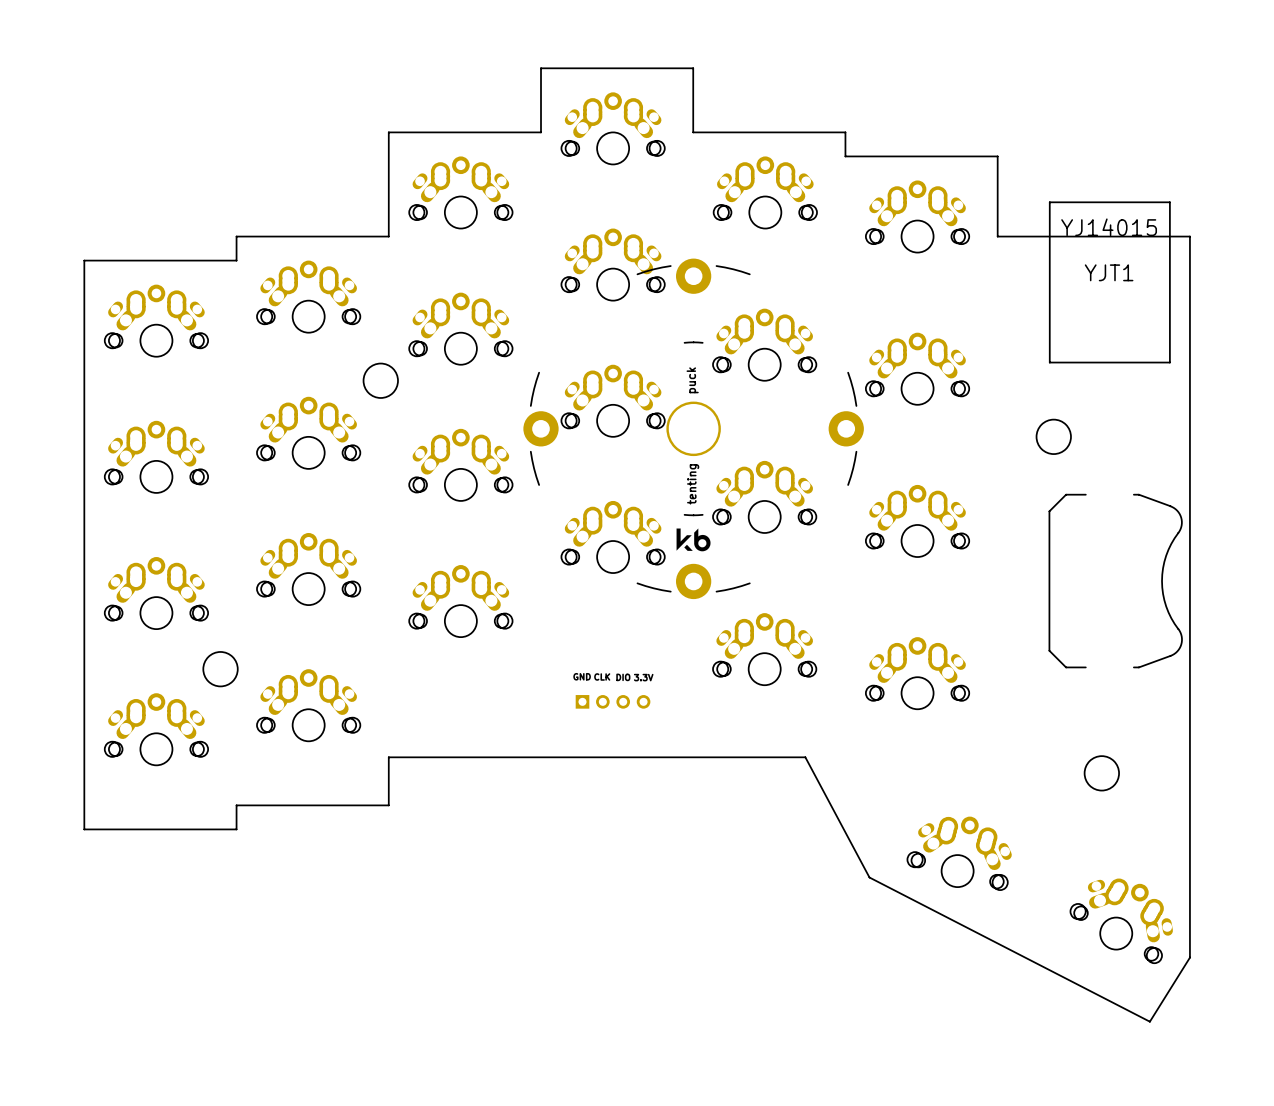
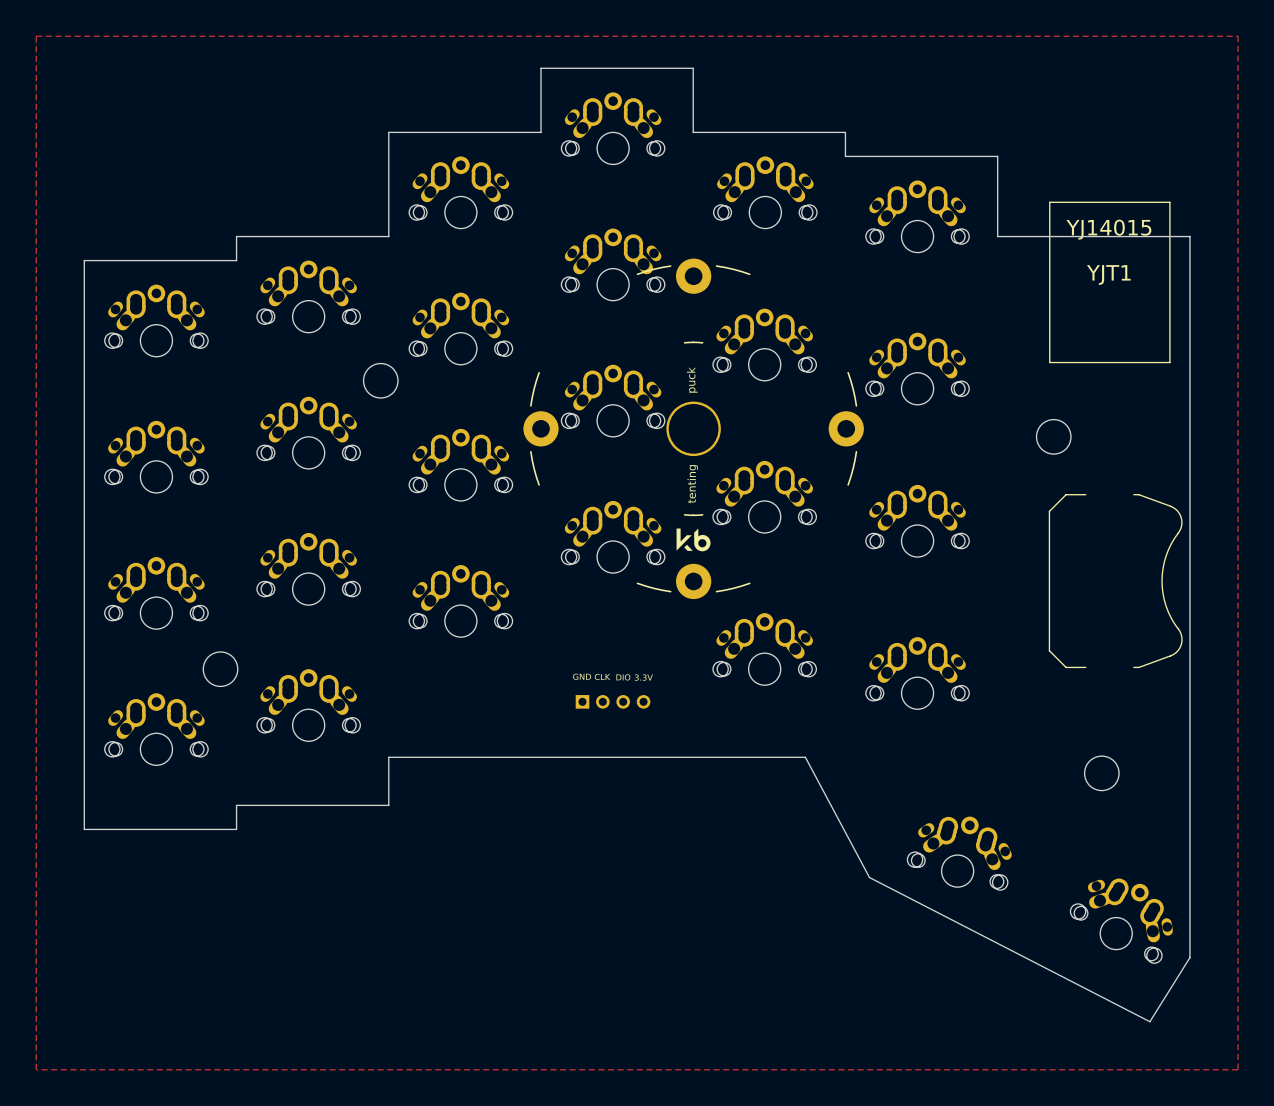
zone outline: none -> (36, 36) (1238, 36) (1238, 1069) (36, 1069) (36, 36)

